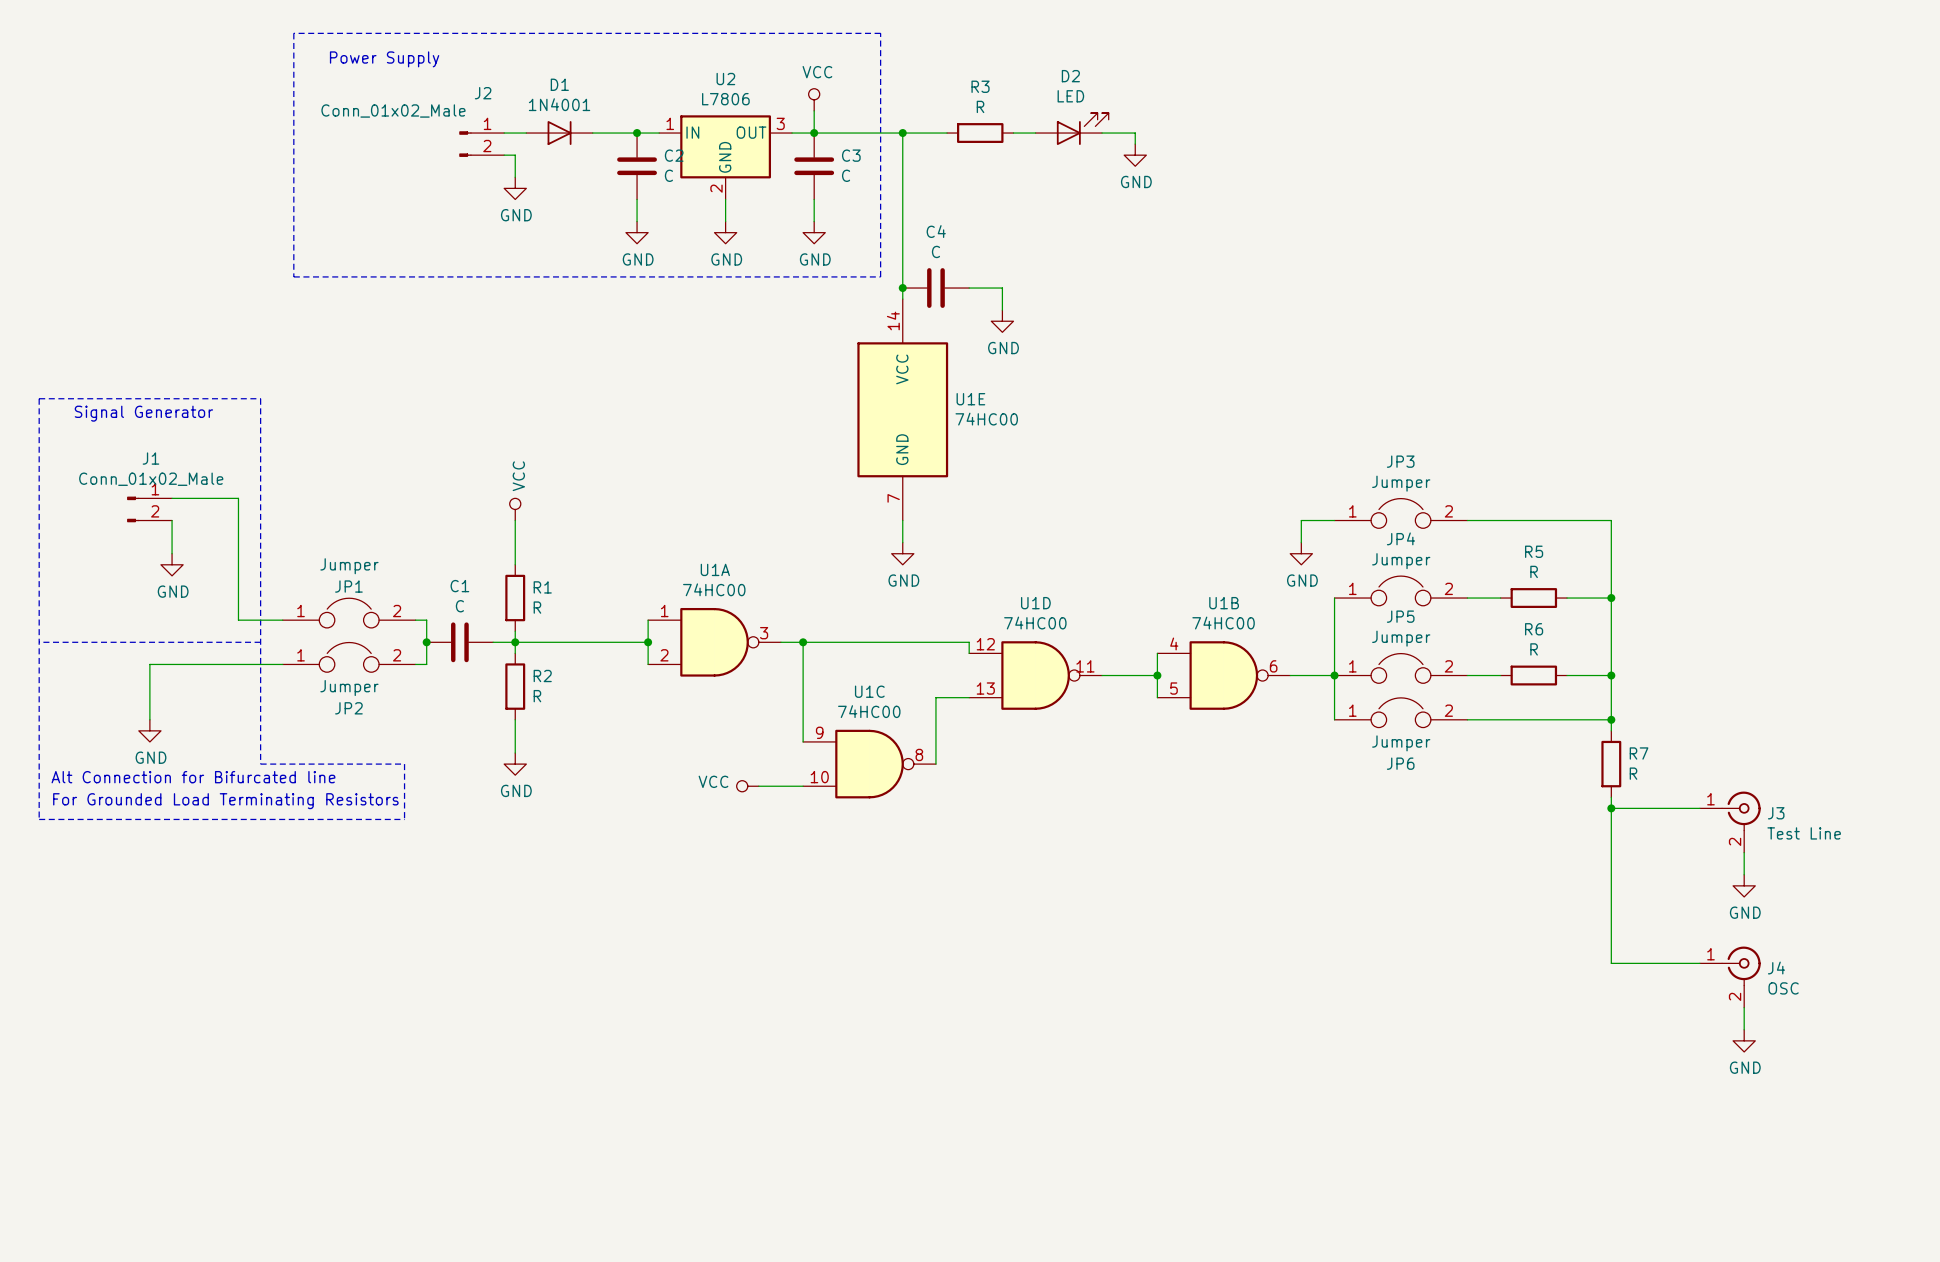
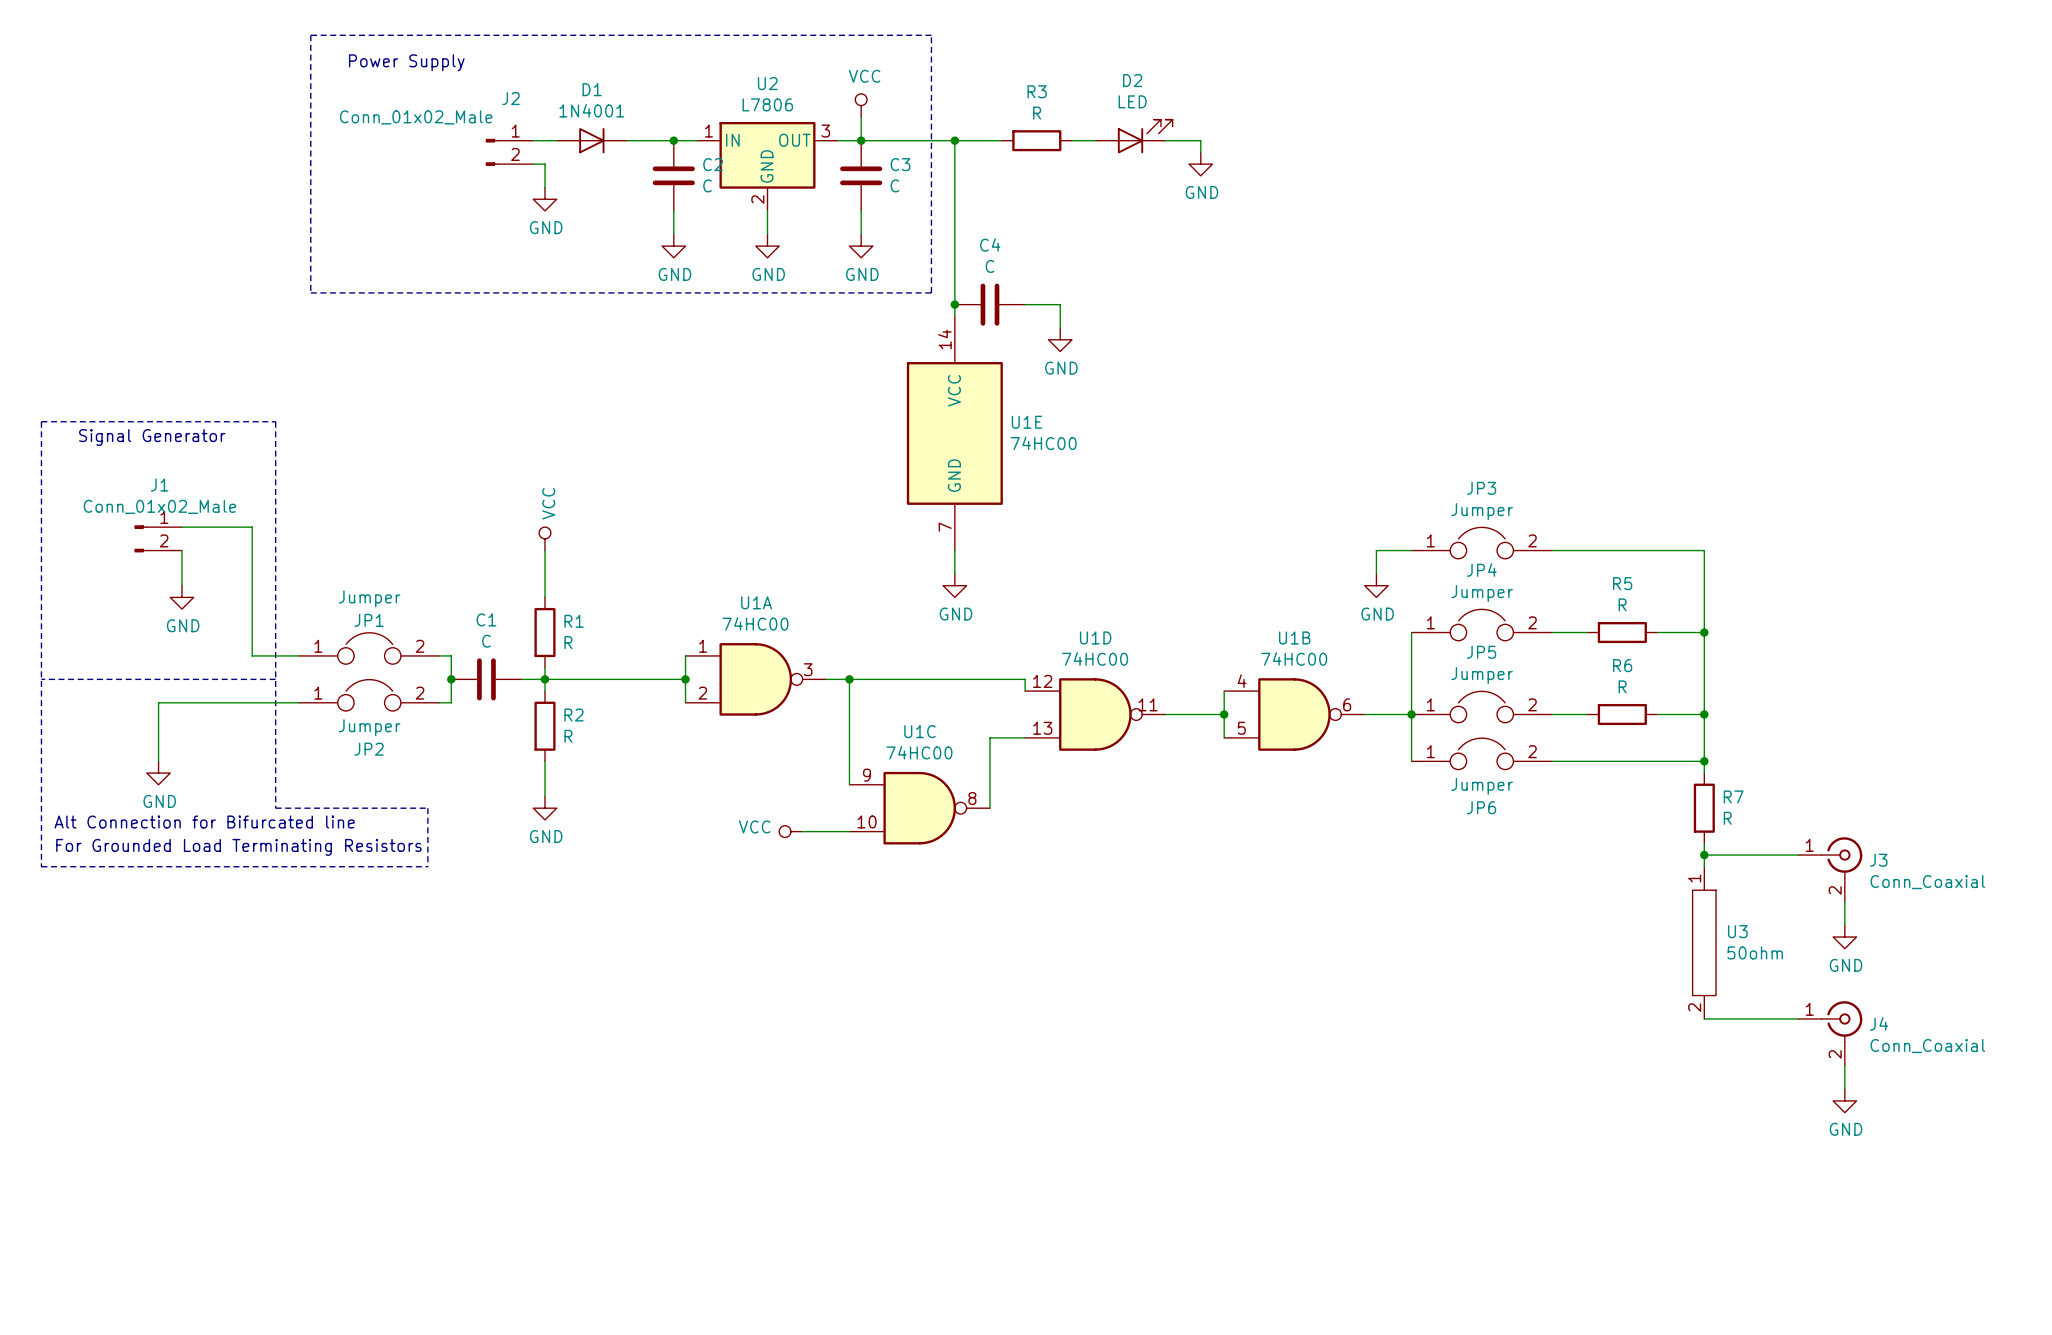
wire: (1611, 819) (1611, 963) -> none
J3 value: Test Line (1804, 833) -> Conn_Coaxial (1927, 882)
U3: none -> 50ohm (1704, 942)
J4 value: OSC (1783, 988) -> Conn_Coaxial (1927, 1046)

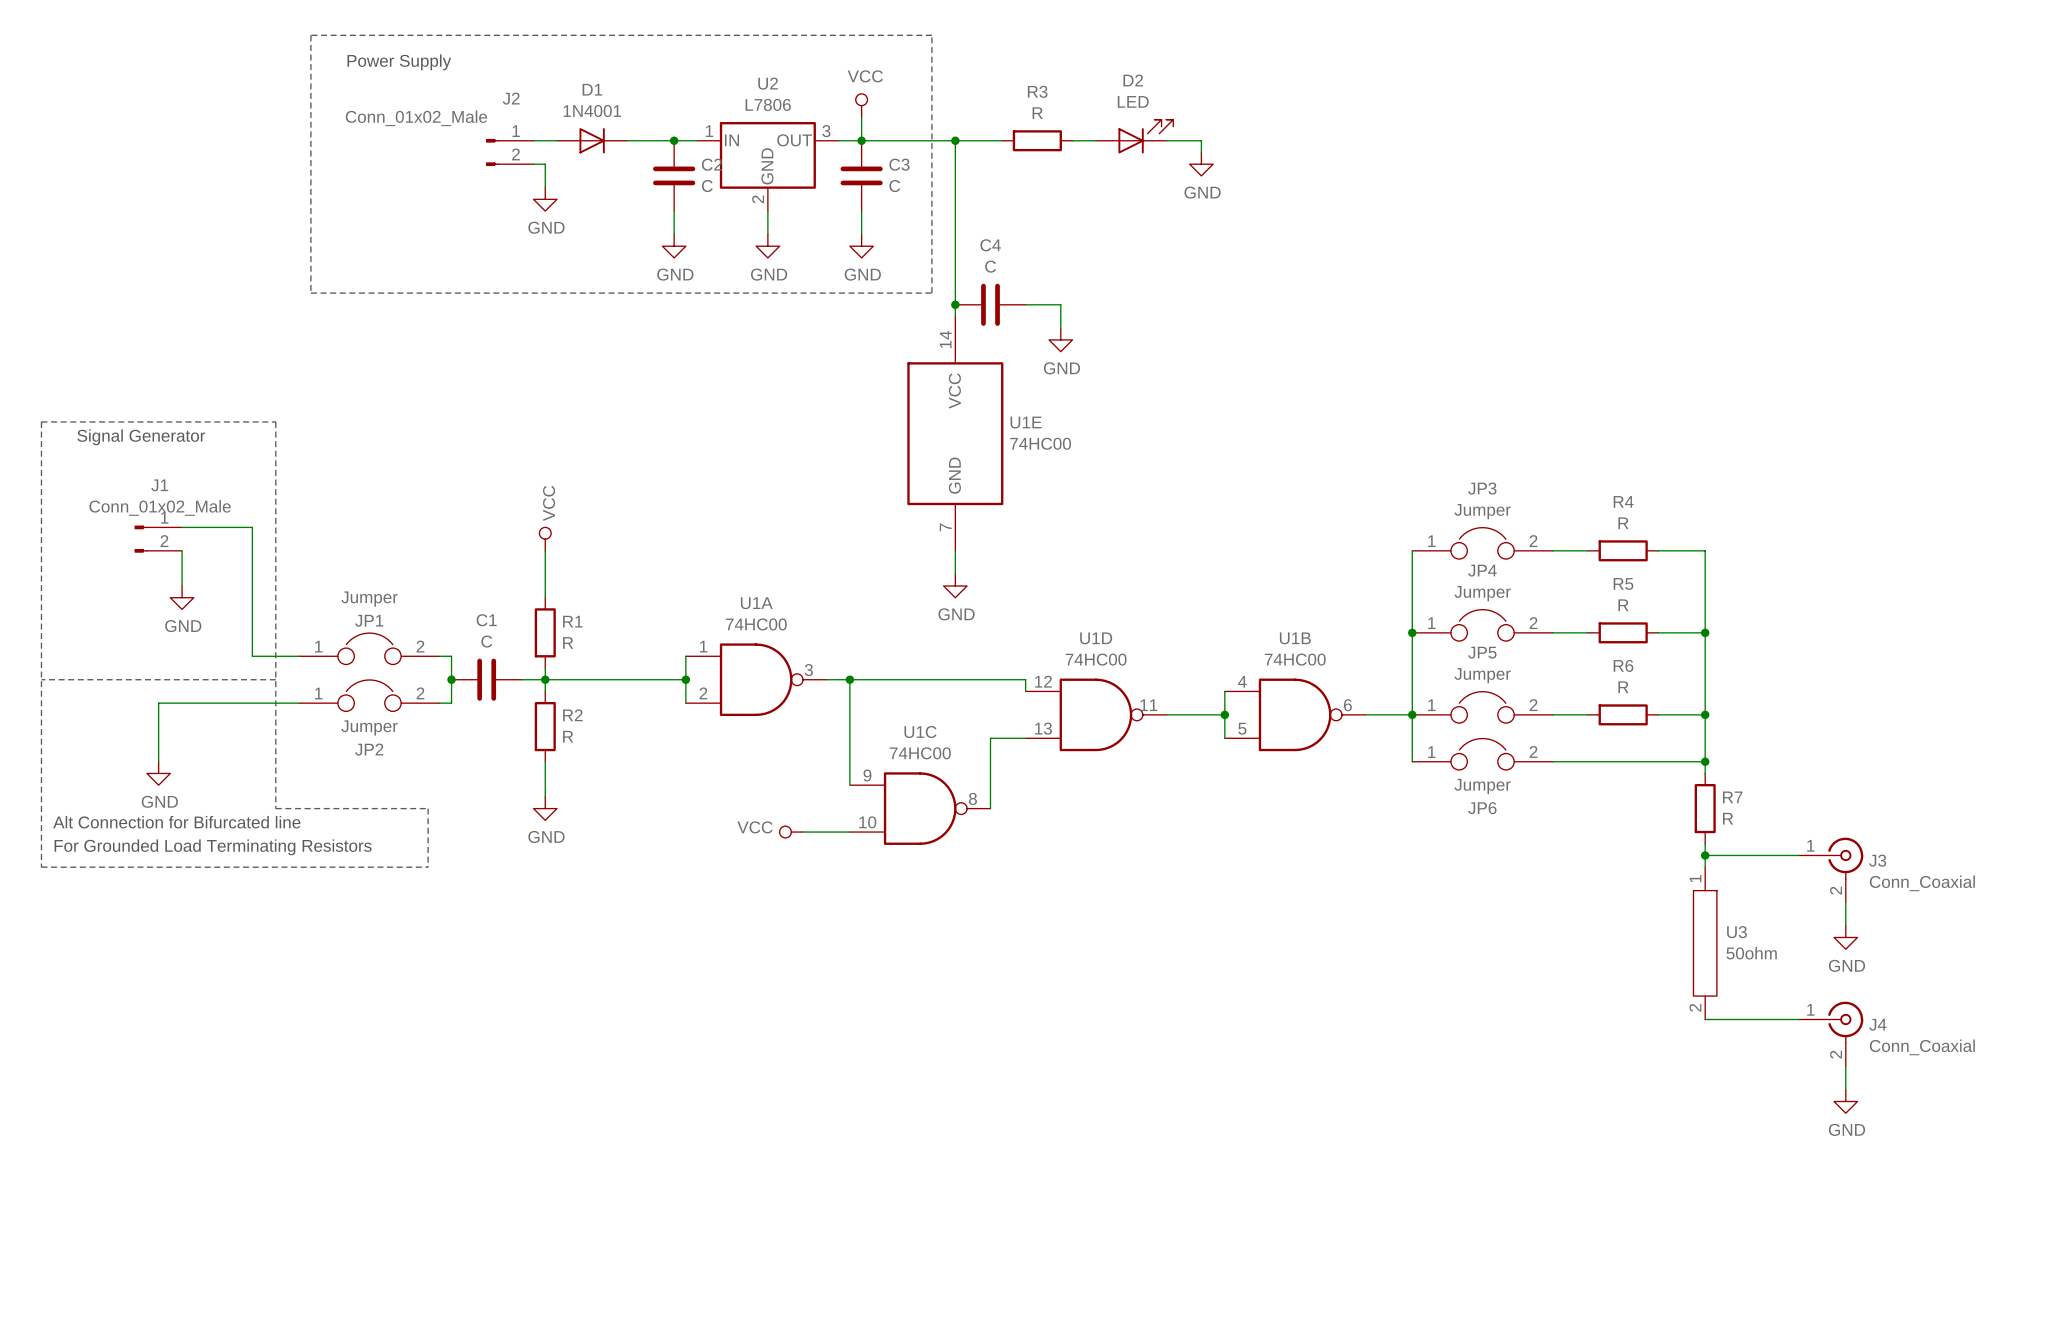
wire: (1411, 550) (1376, 550) (1376, 573) -> (1412, 550) (1412, 632)
wire: (1587, 550) (1657, 550) -> none
R4: none -> R (1623, 550)
power symbol: GND (1376, 585) -> none
junction: none -> (1412, 632)

